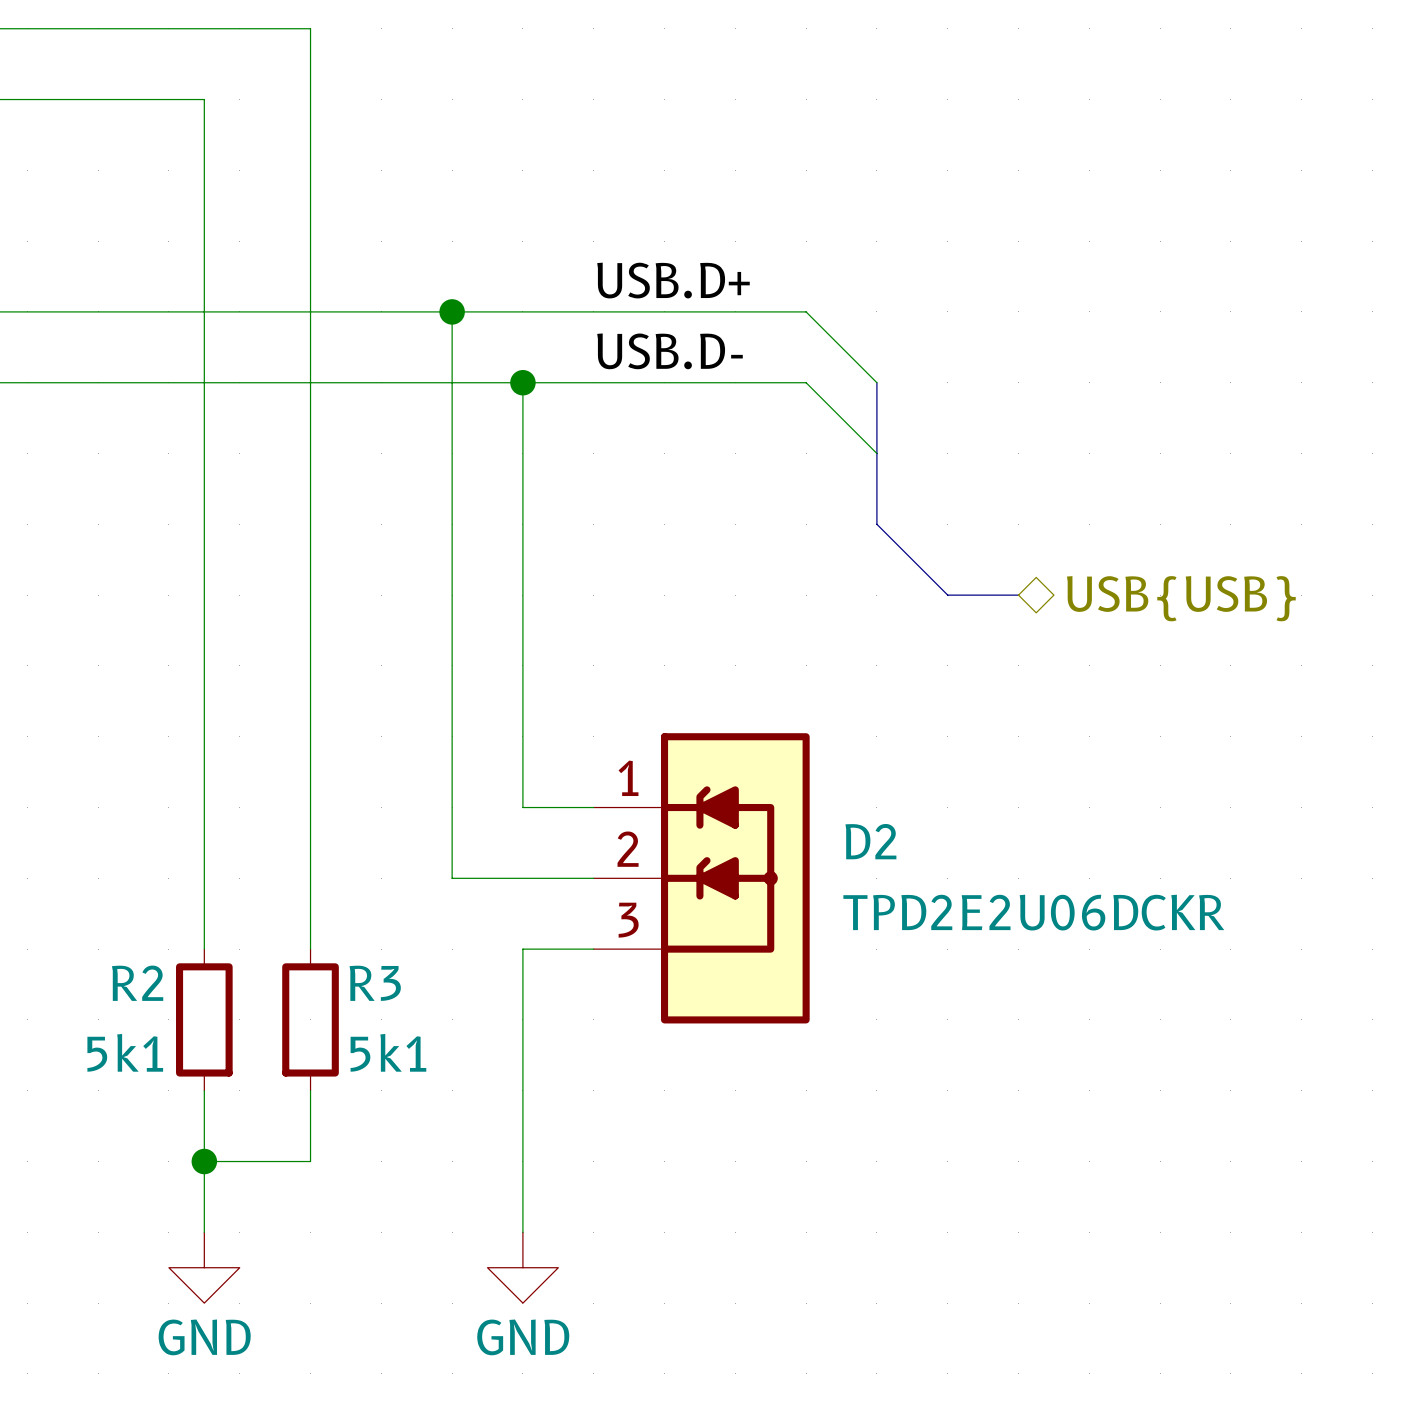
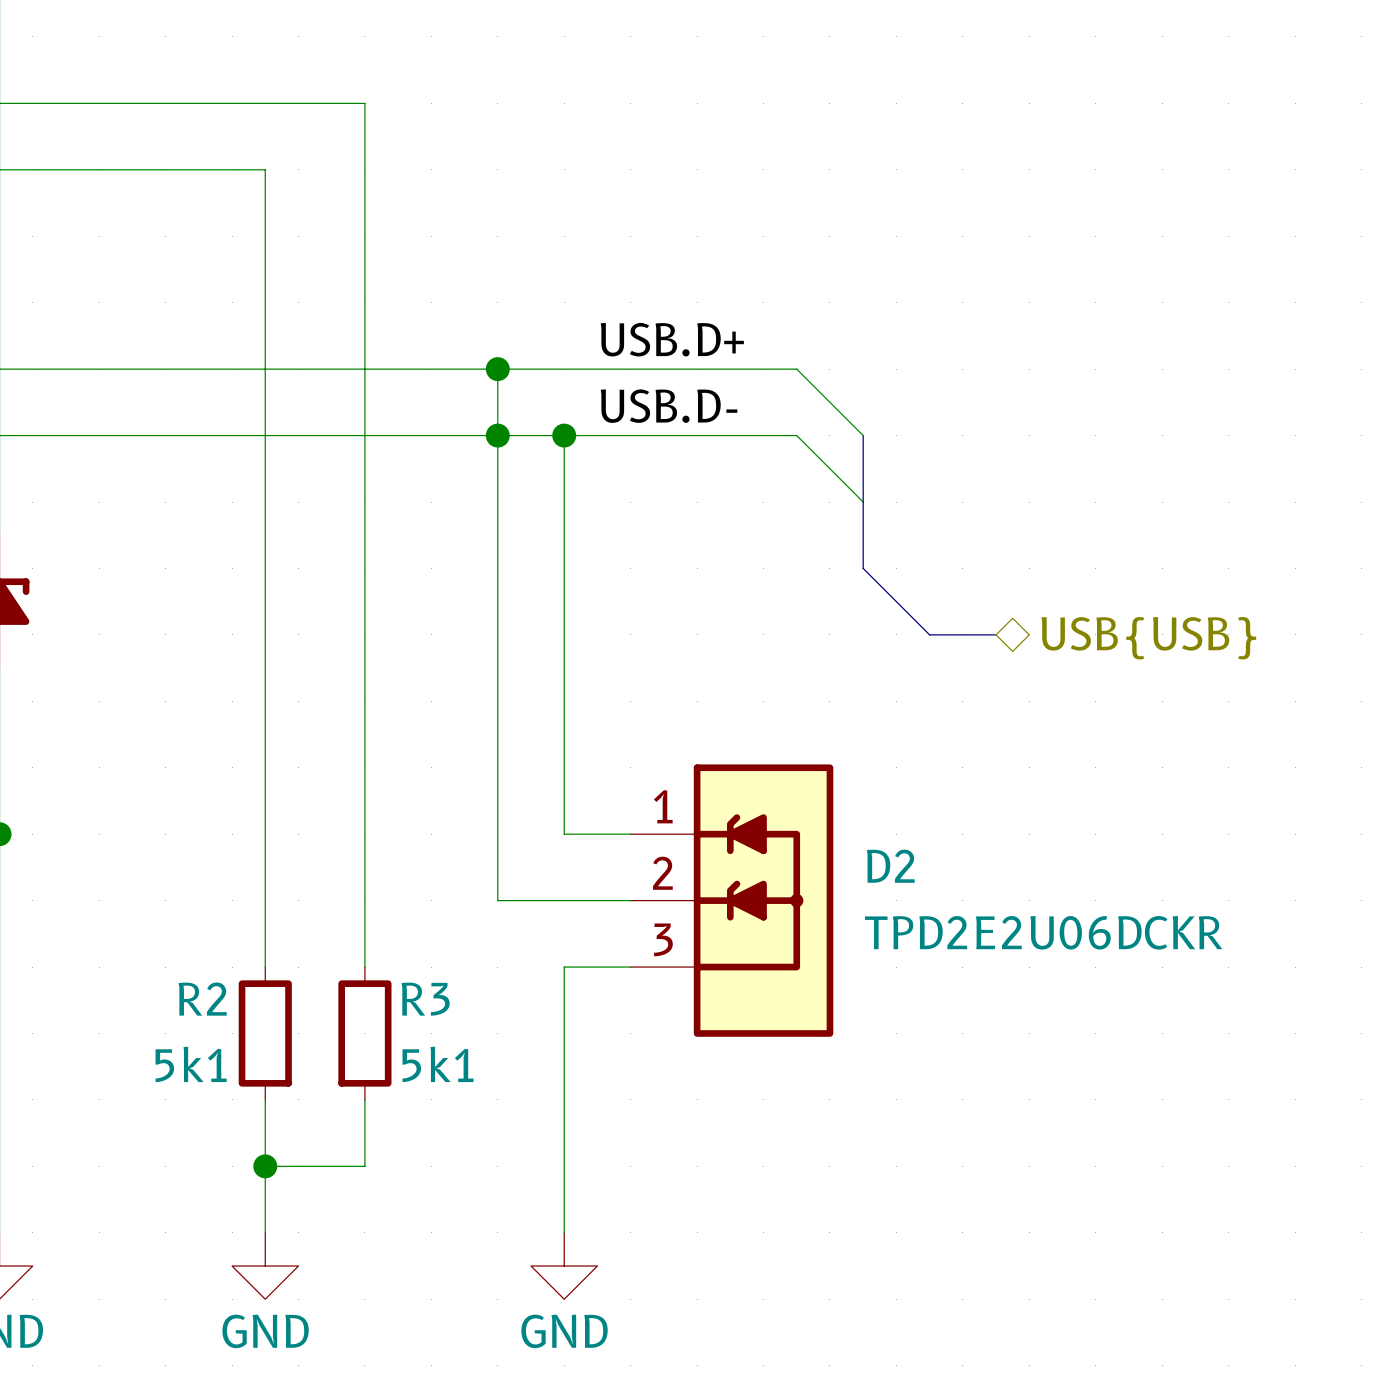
label position: USB.D+ (673, 280) -> USB.D+ (672, 339)
wire: (770, 311) (806, 311) (876, 382) -> (796, 369) (863, 435)
label position: USB.D- (670, 351) -> USB.D- (669, 406)
junction: none -> (497, 435)
wire: (770, 382) (806, 382) (876, 453) -> (796, 435) (863, 502)
bus: (876, 382) (876, 524) (947, 595) -> (863, 435) (863, 568) (929, 634) (962, 634)
bus: (983, 595) (1018, 595) -> none
hierarchical label position: USB{USB} (1181, 598) -> USB{USB} (1148, 638)

